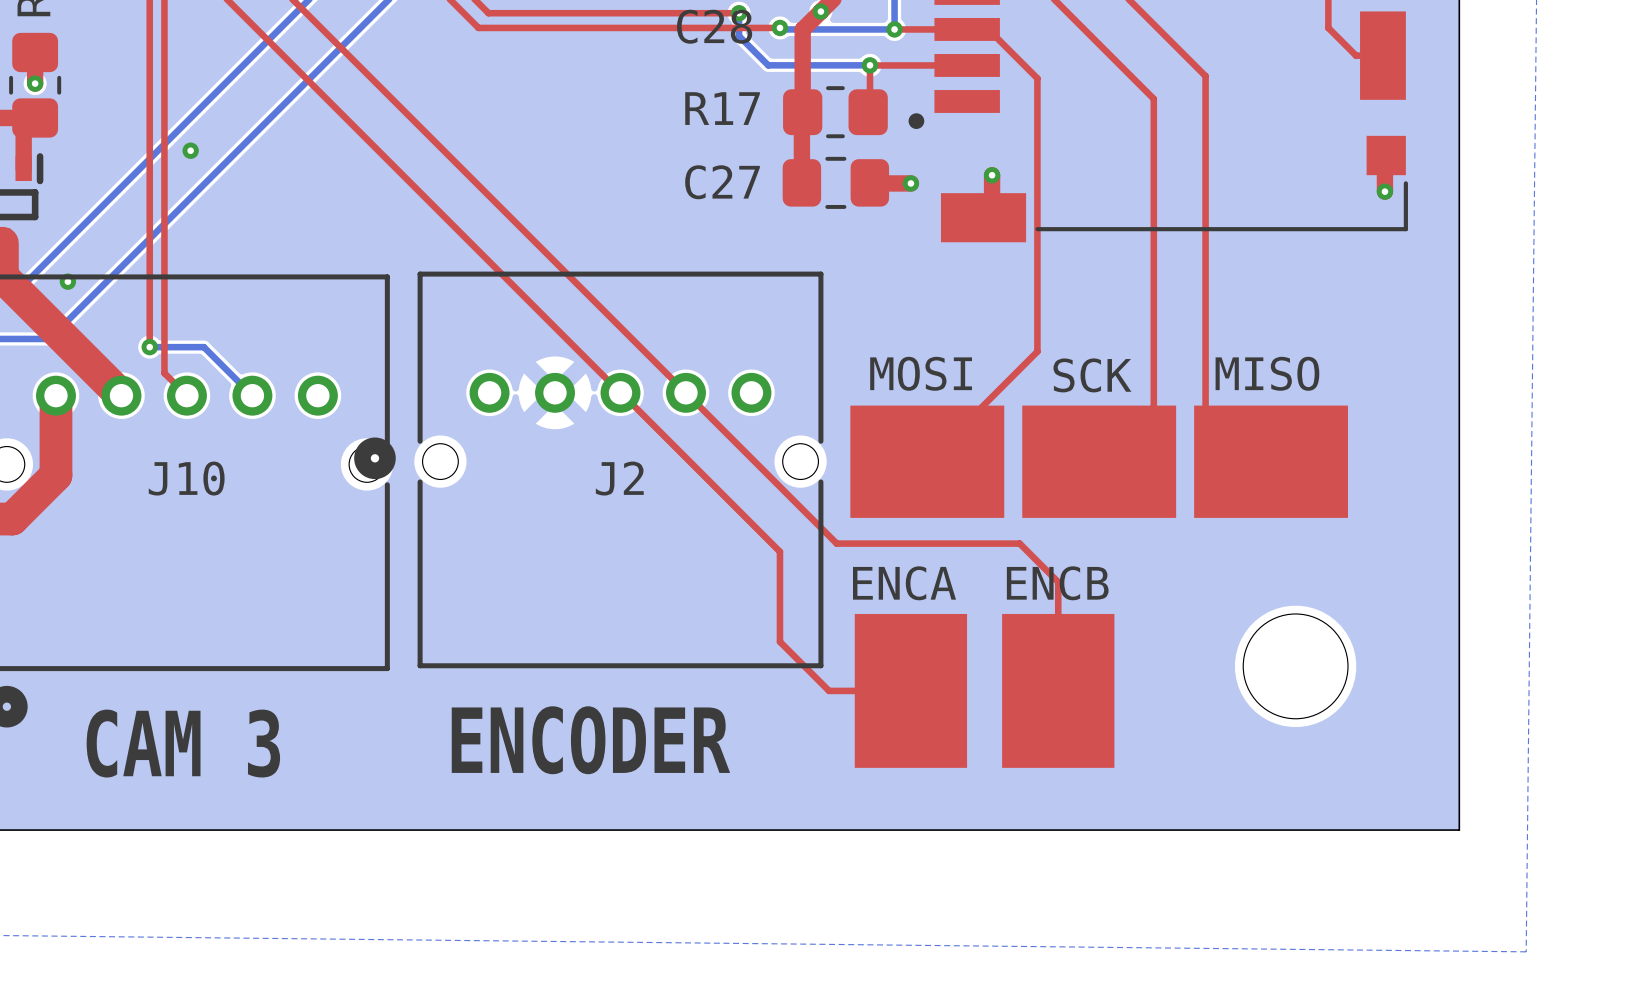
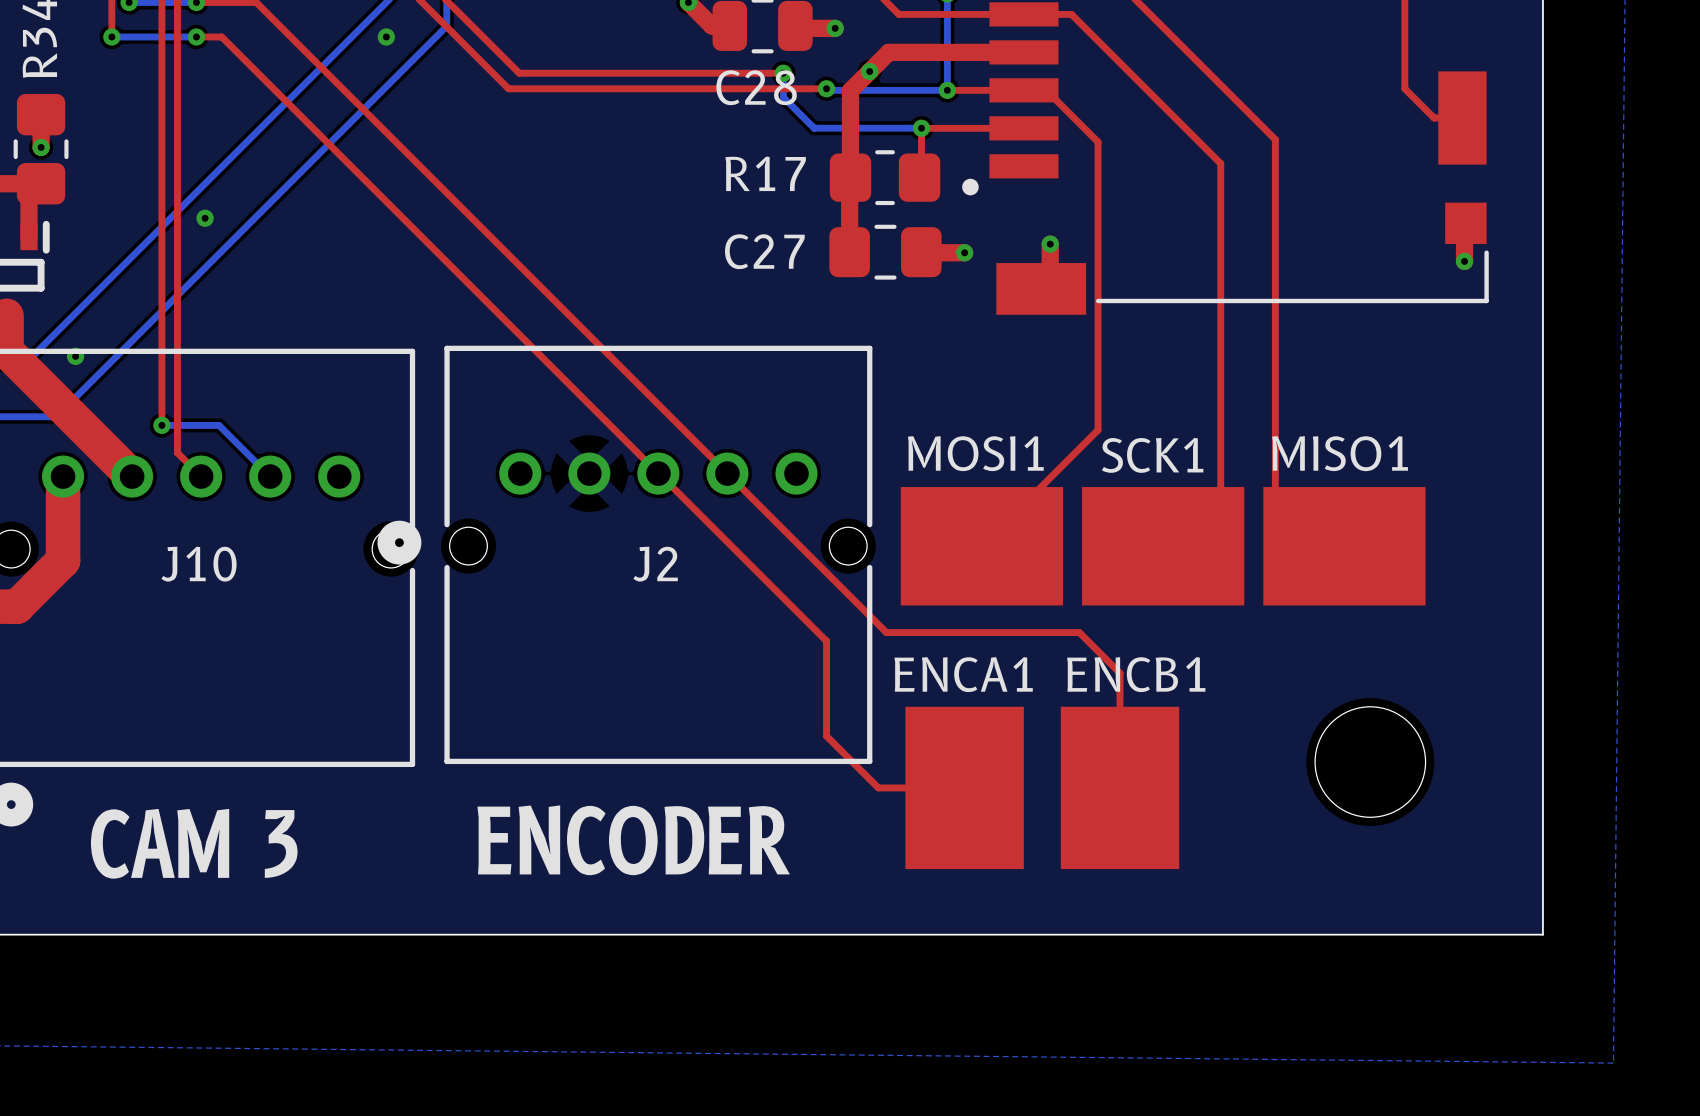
MOSI name: MOSI (921, 373) -> MOSI1 (975, 453)
MISO name: MISO (1267, 373) -> MISO1 (1340, 453)
SCK name: SCK (1092, 375) -> SCK1 (1152, 455)
ENCA name: ENCA (904, 583) -> ENCA1 (963, 674)
ENCB name: ENCB (1057, 583) -> ENCB1 (1136, 674)

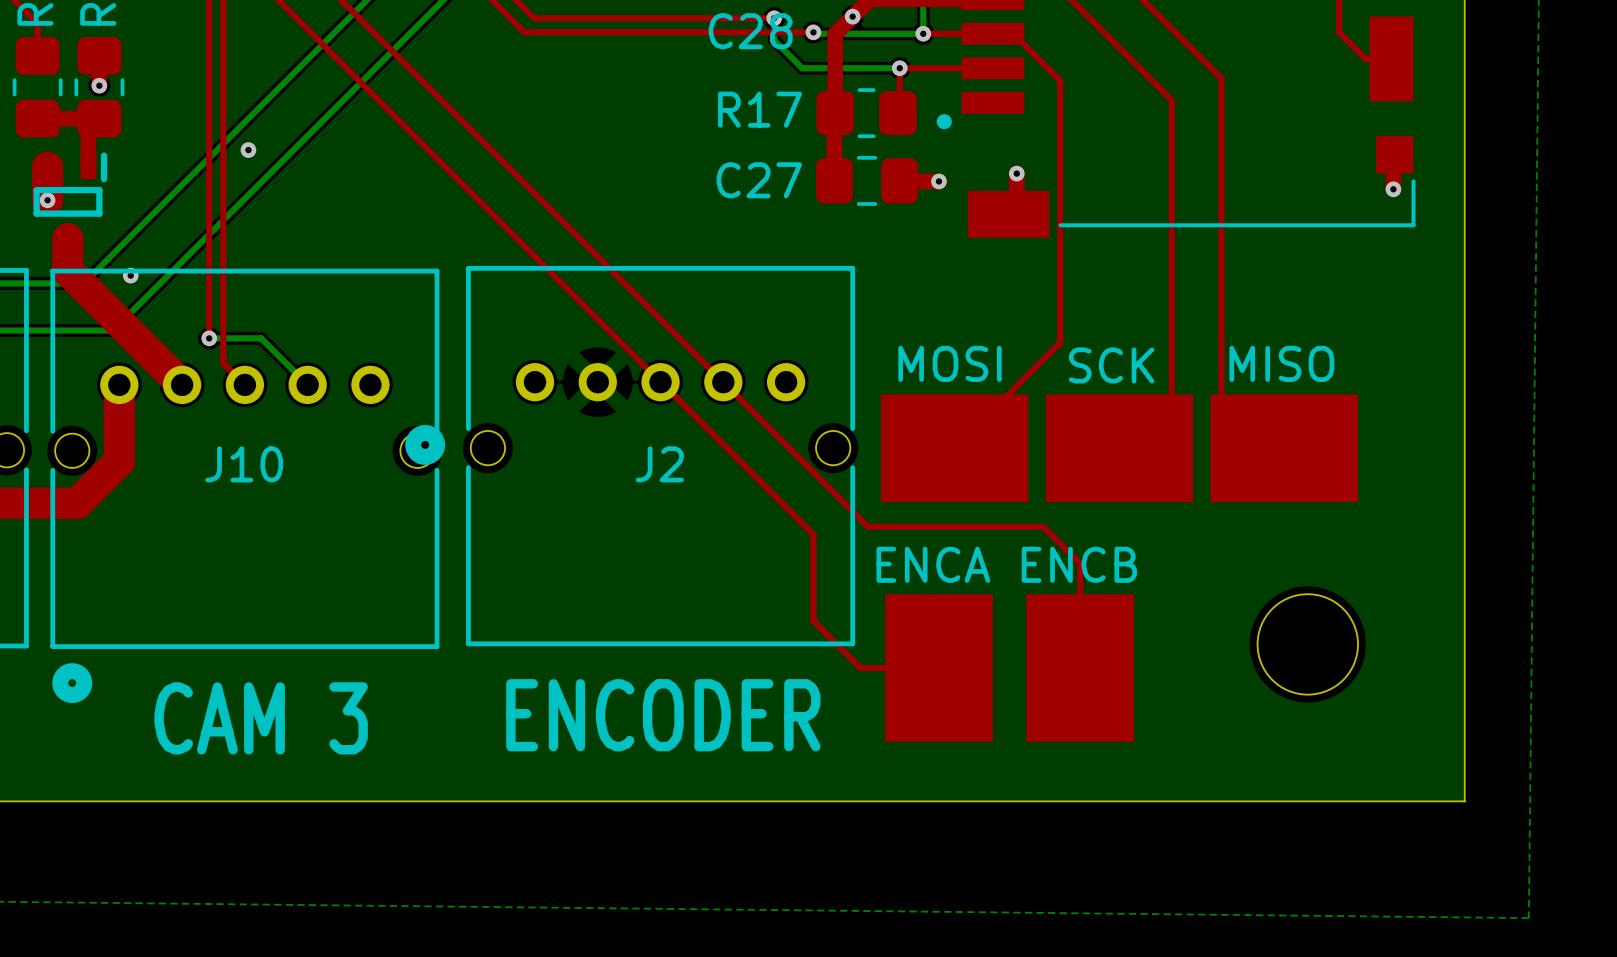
MOSI1 name: MOSI1 (975, 453) -> MOSI (949, 363)
MISO1 name: MISO1 (1340, 453) -> MISO (1281, 363)
SCK1 name: SCK1 (1152, 455) -> SCK (1111, 365)
ENCA1 name: ENCA1 (963, 674) -> ENCA (933, 564)
ENCB1 name: ENCB1 (1136, 674) -> ENCB (1079, 564)

